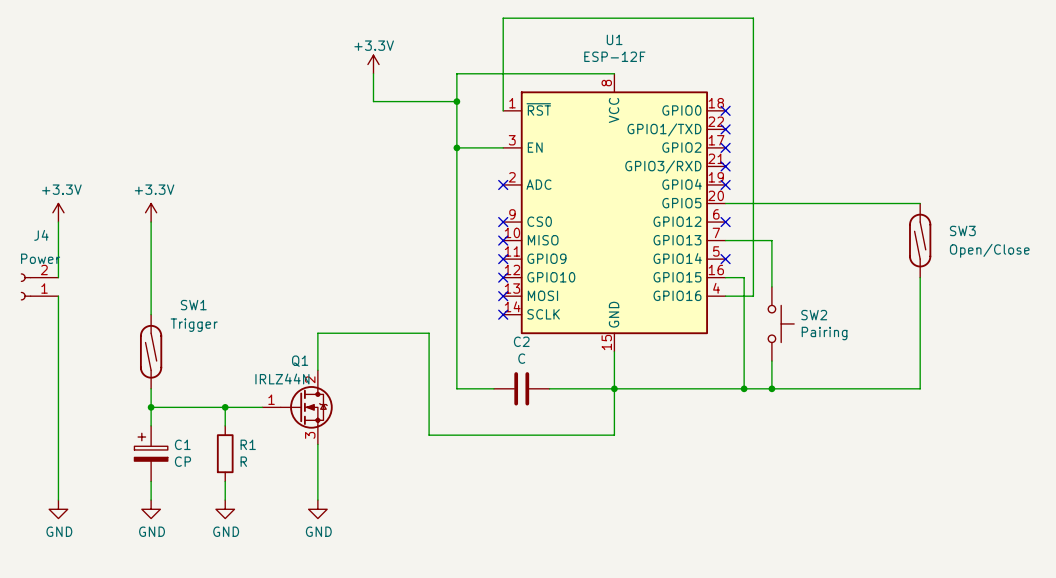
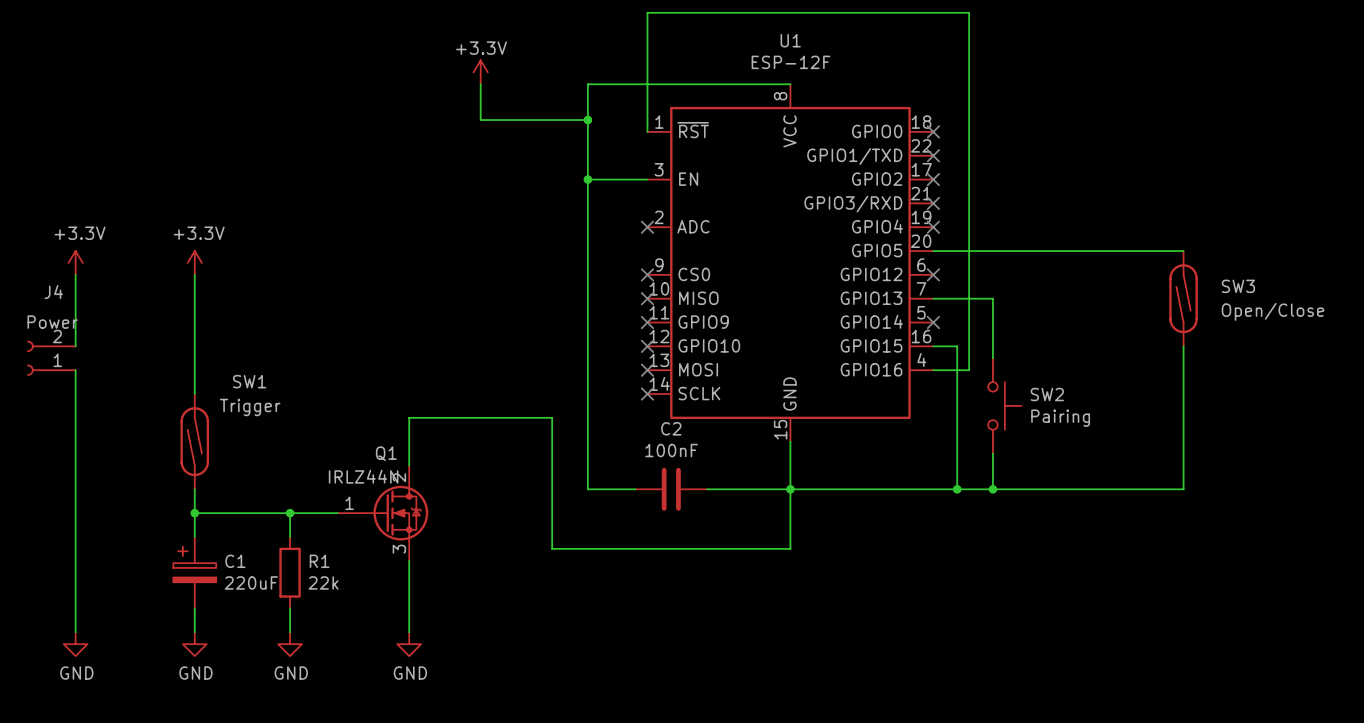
C2 value: C (521, 358) -> 100nF (671, 450)
C1 value: CP (182, 461) -> 220uF (251, 582)
R1 value: R (243, 461) -> 22k (323, 582)

